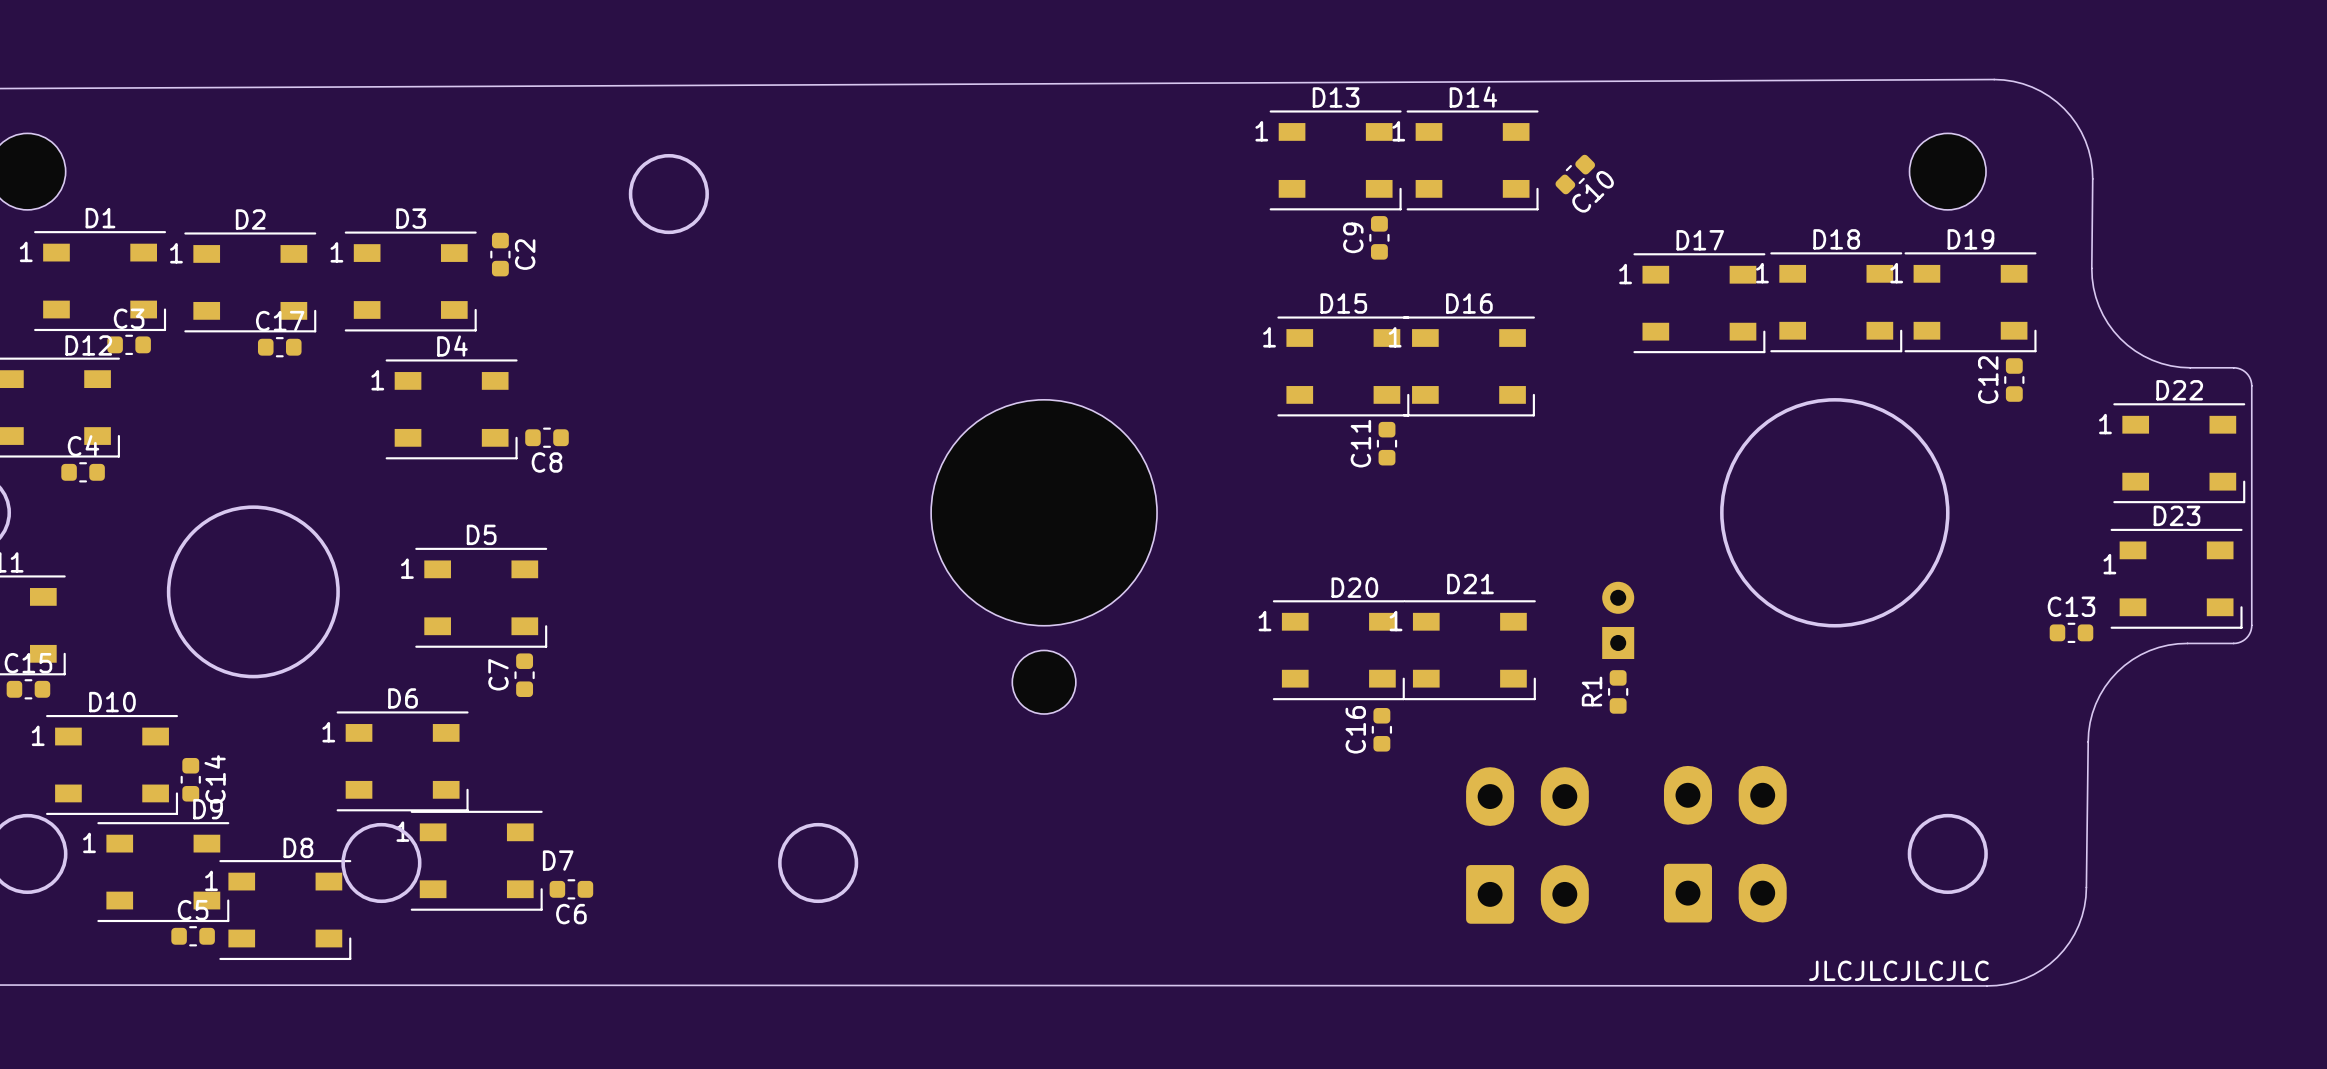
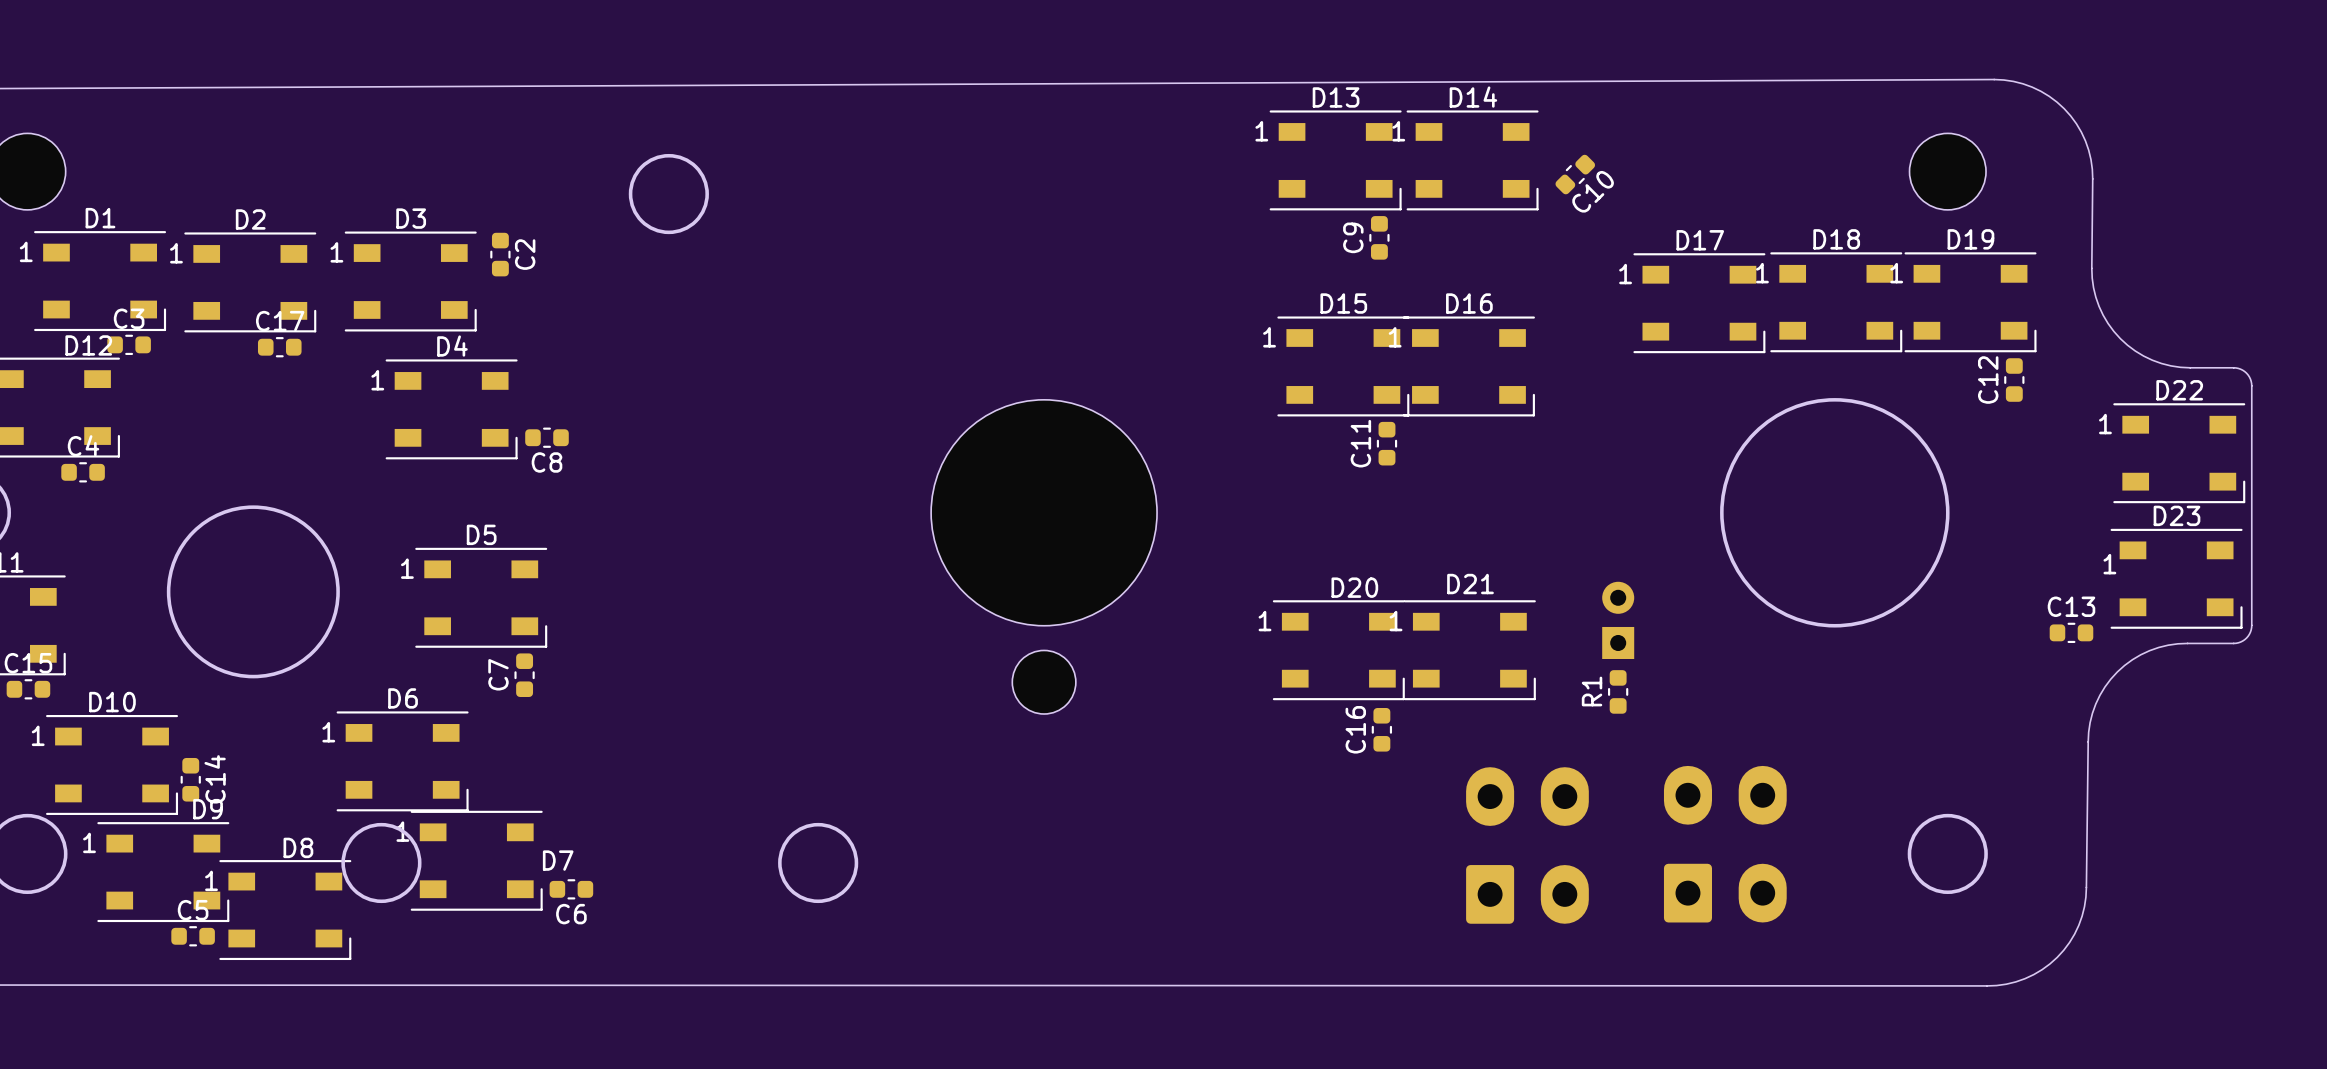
text: JLCJLCJLCJLC (1898, 970) -> none

